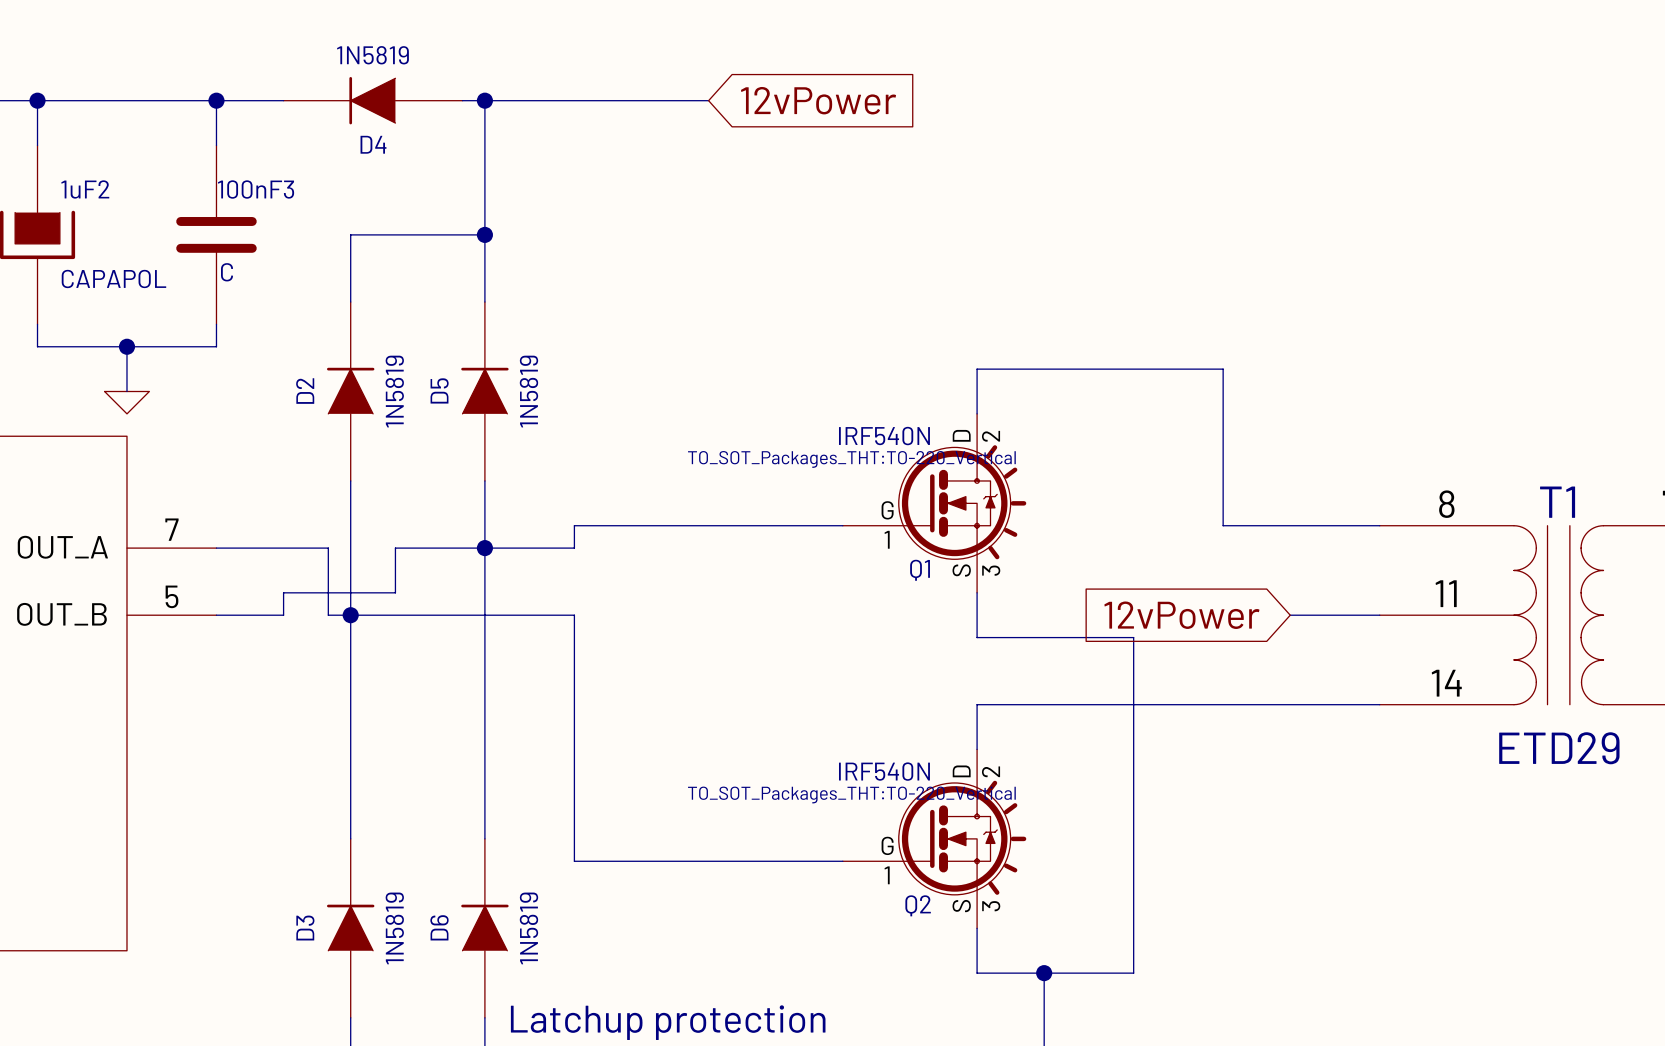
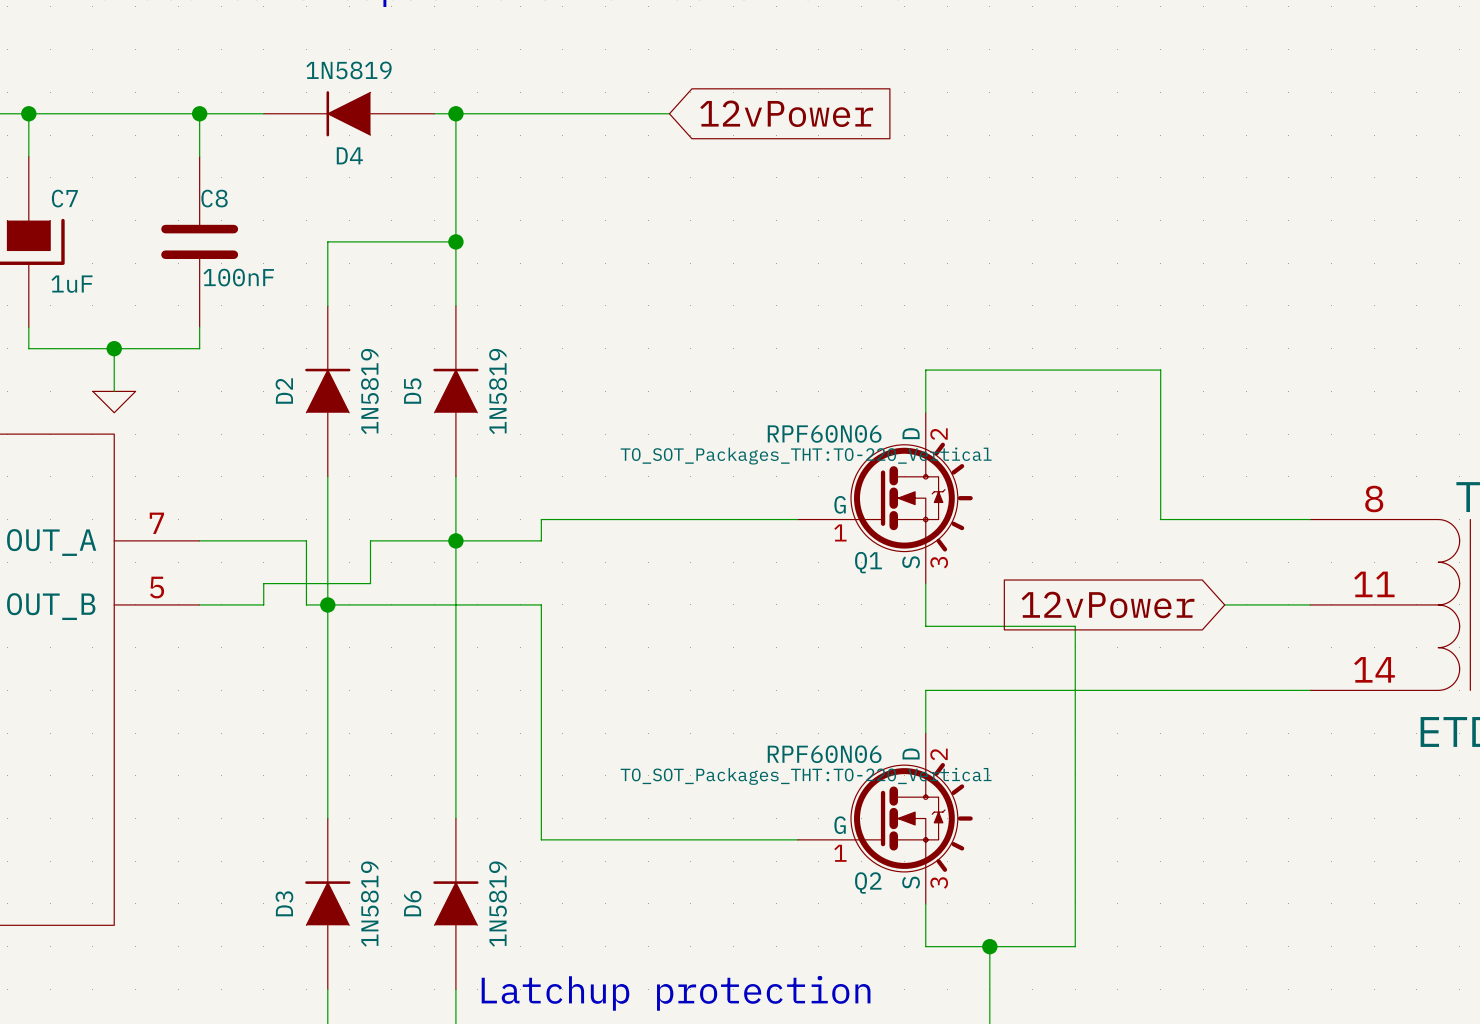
1uF2 name: 1uF2 (85, 189) -> C7 (64, 198)
100nF3 name: 100nF3 (256, 189) -> C8 (214, 198)
100nF3 value: C (227, 272) -> 100nF (238, 277)
1uF2 value: CAPAPOL (113, 278) -> 1uF (71, 284)
Q1 value: IRF540N (884, 436) -> RPF60N06 (824, 433)
Q2 value: IRF540N (884, 771) -> RPF60N06 (824, 754)

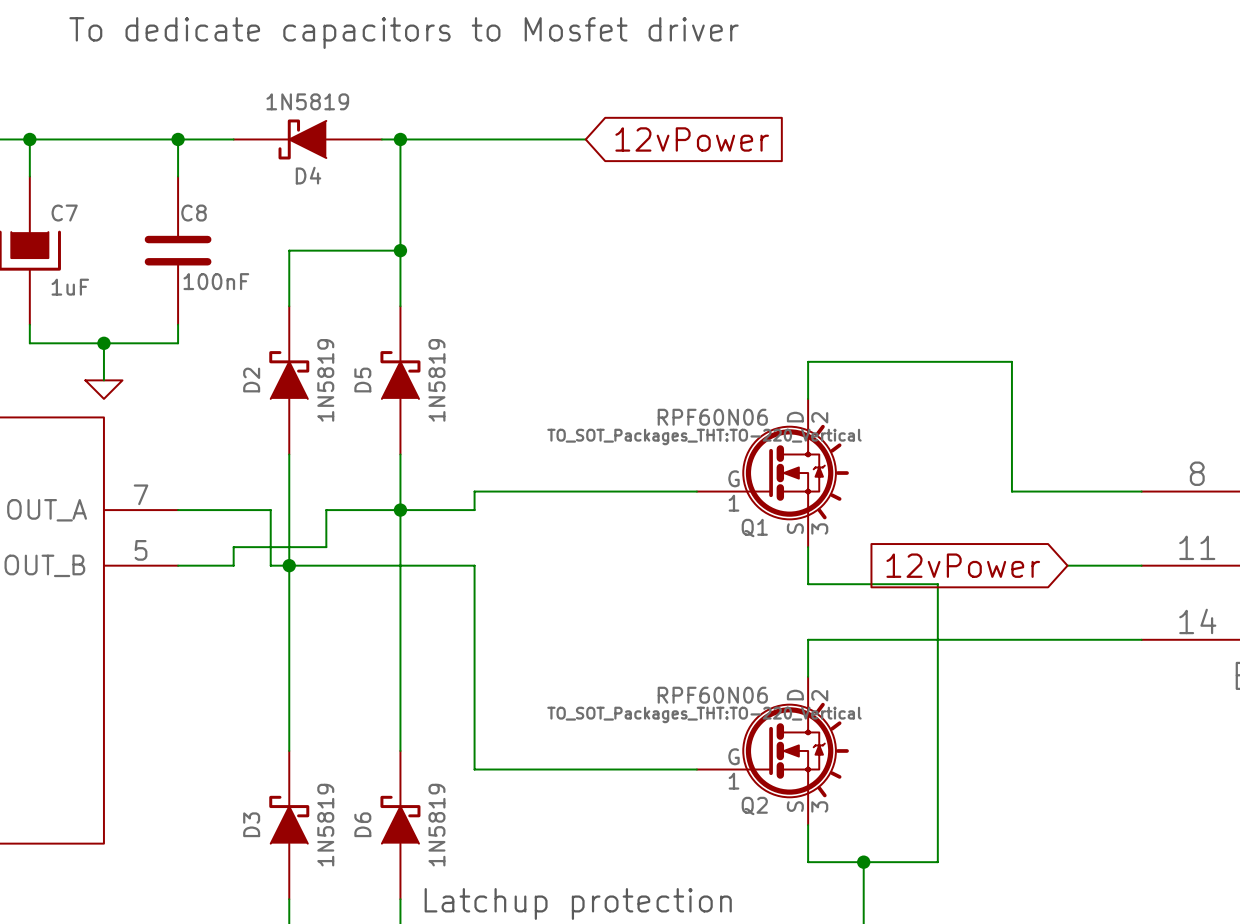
D4 symbol: [263, 91, 435, 137] -> [233, 119, 382, 160]
D2 symbol: [305, 305, 351, 477] -> [269, 306, 310, 455]
D5 symbol: [433, 305, 479, 477] -> [380, 306, 421, 455]
D3 symbol: [305, 818, 351, 990] -> [269, 750, 310, 900]
D6 symbol: [433, 818, 479, 990] -> [380, 750, 421, 900]

